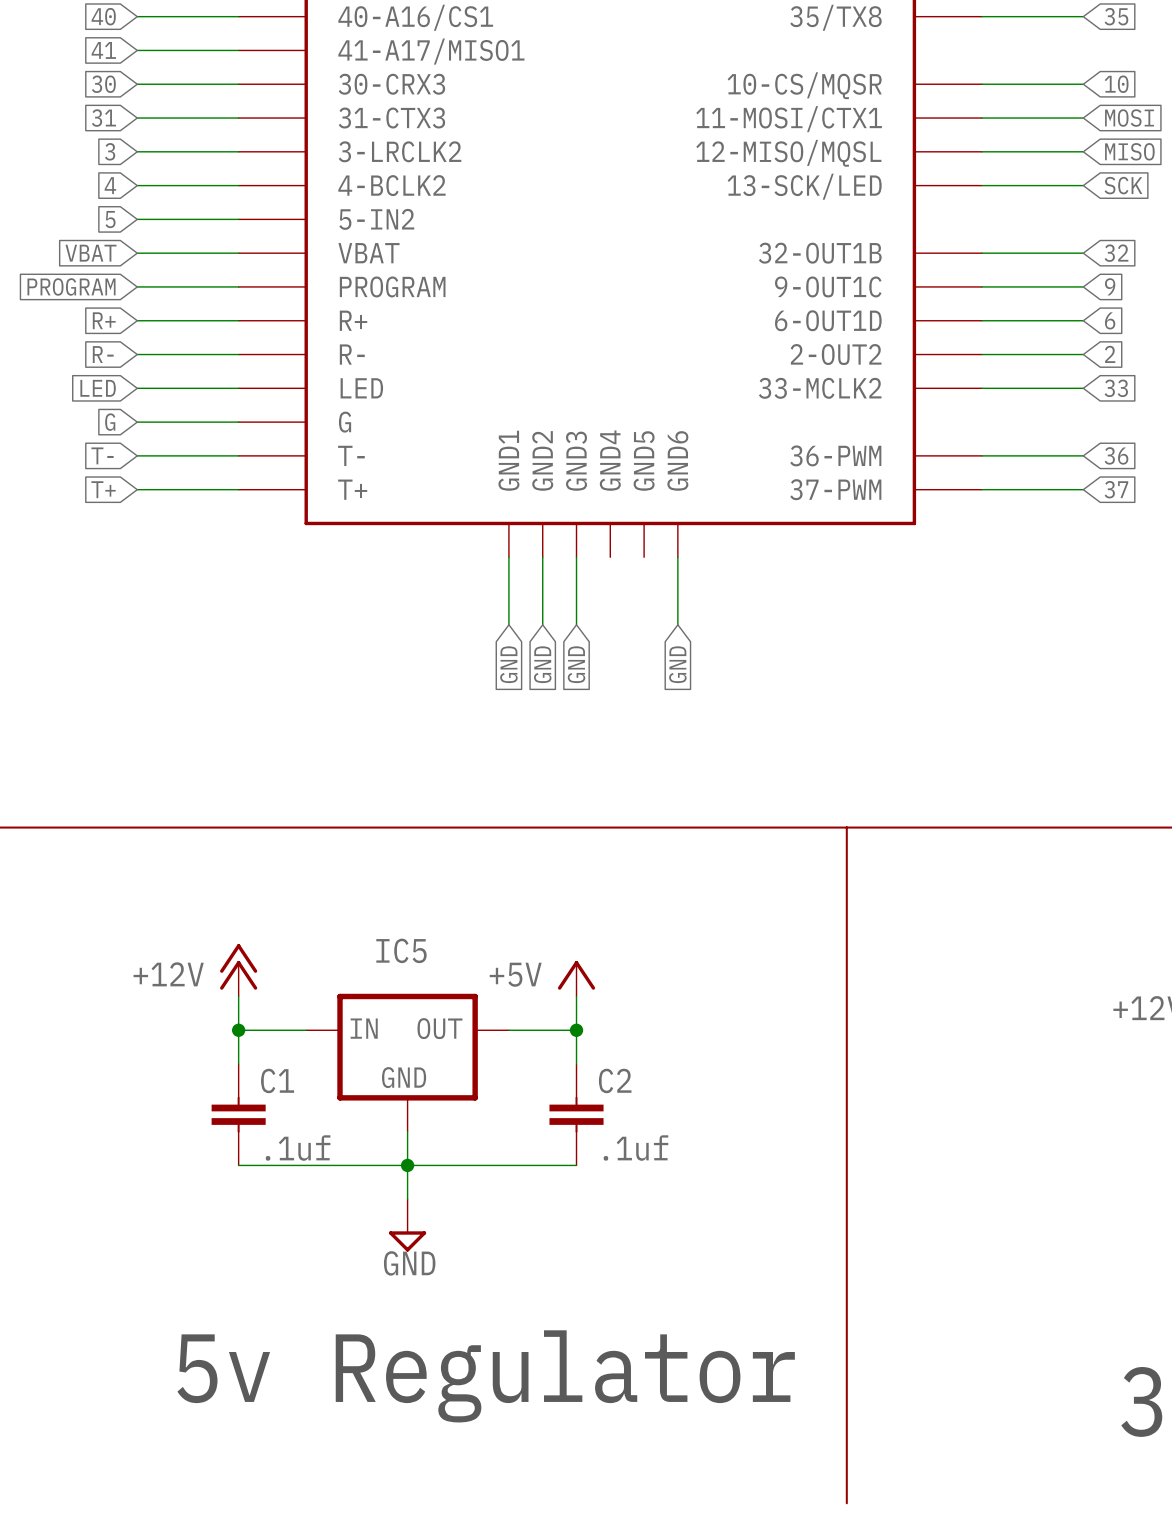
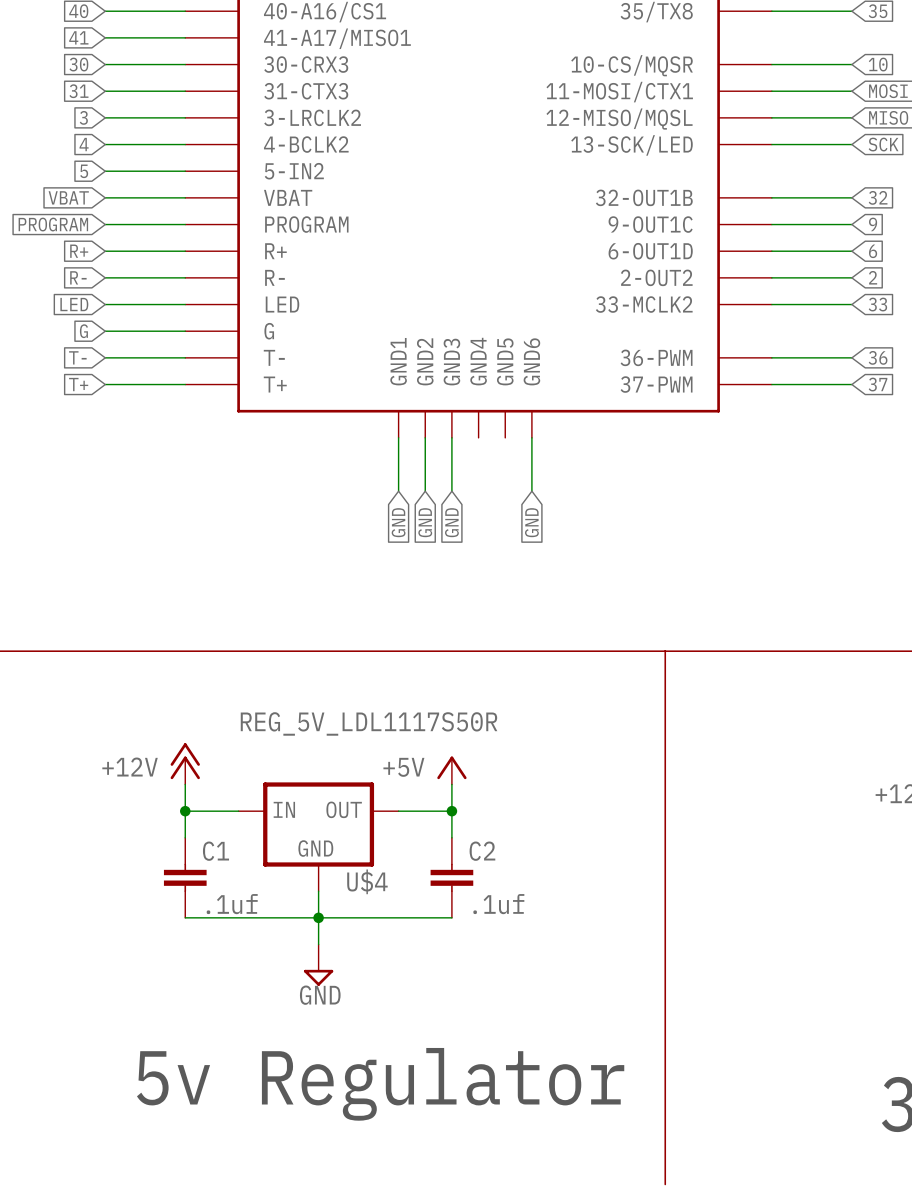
IC5 value: none -> REG_5V_LDL1117S50R (369, 723)
IC5 name: IC5 (401, 950) -> U$4 (367, 881)

